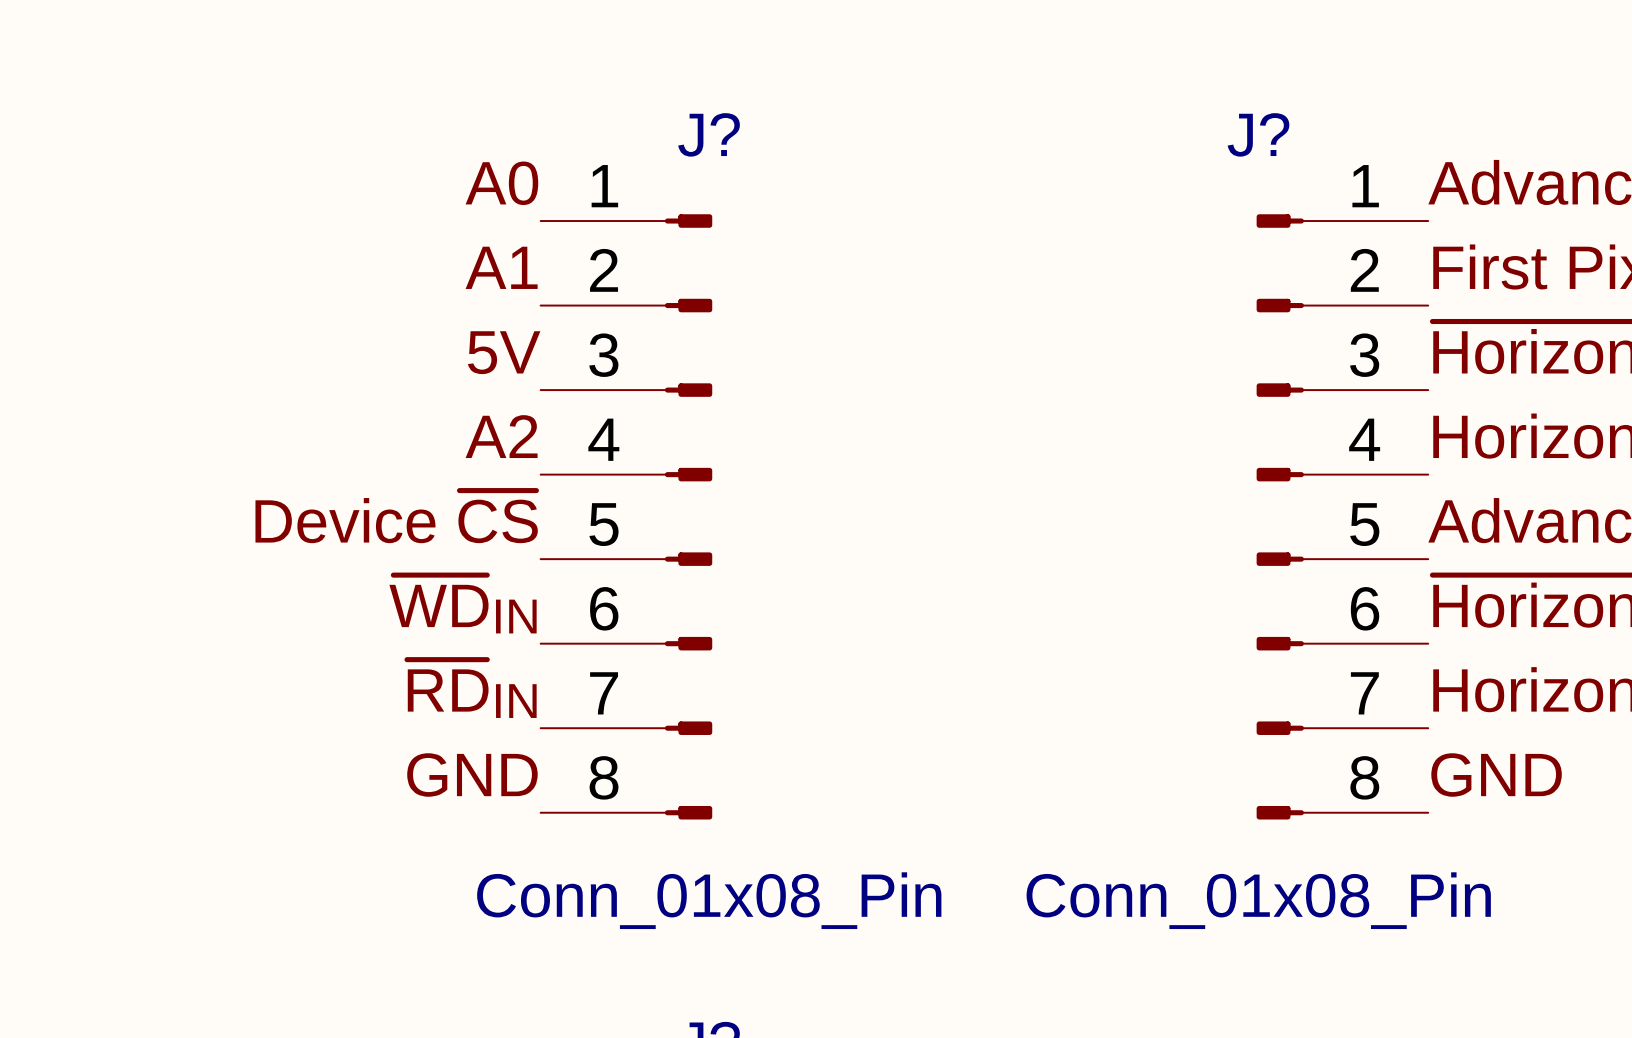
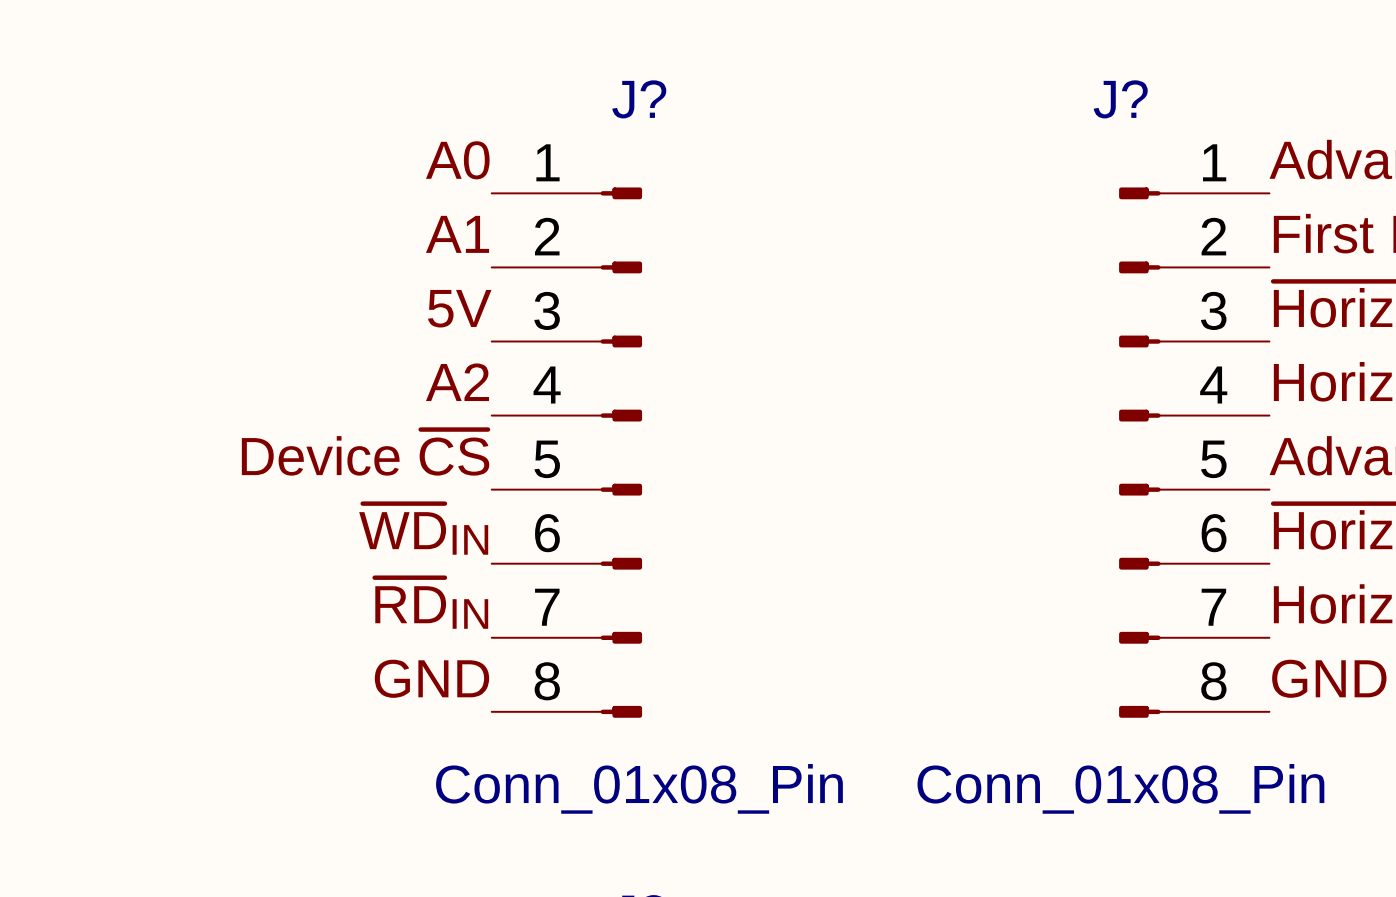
J? name position: J? (709, 134) -> J? (639, 99)
J? name position: J? (1258, 134) -> J? (1120, 99)

